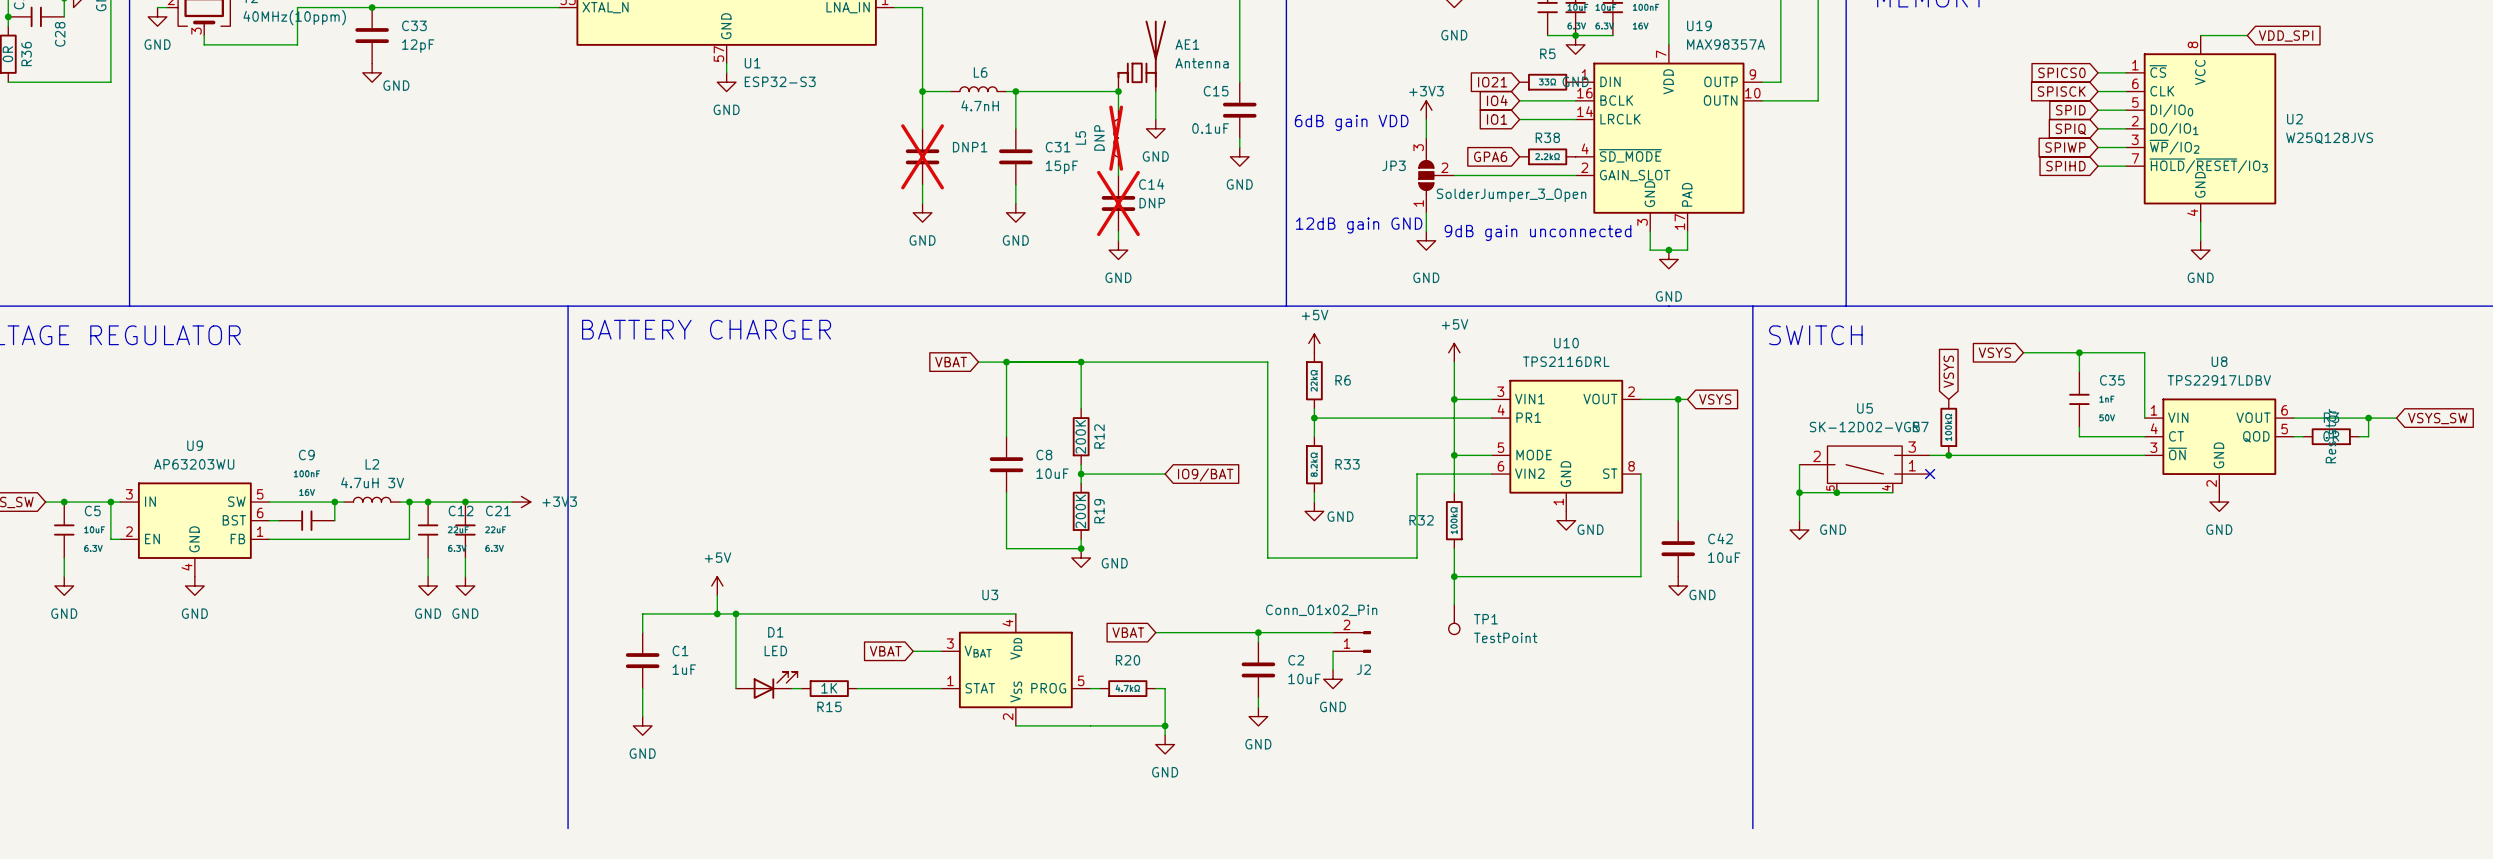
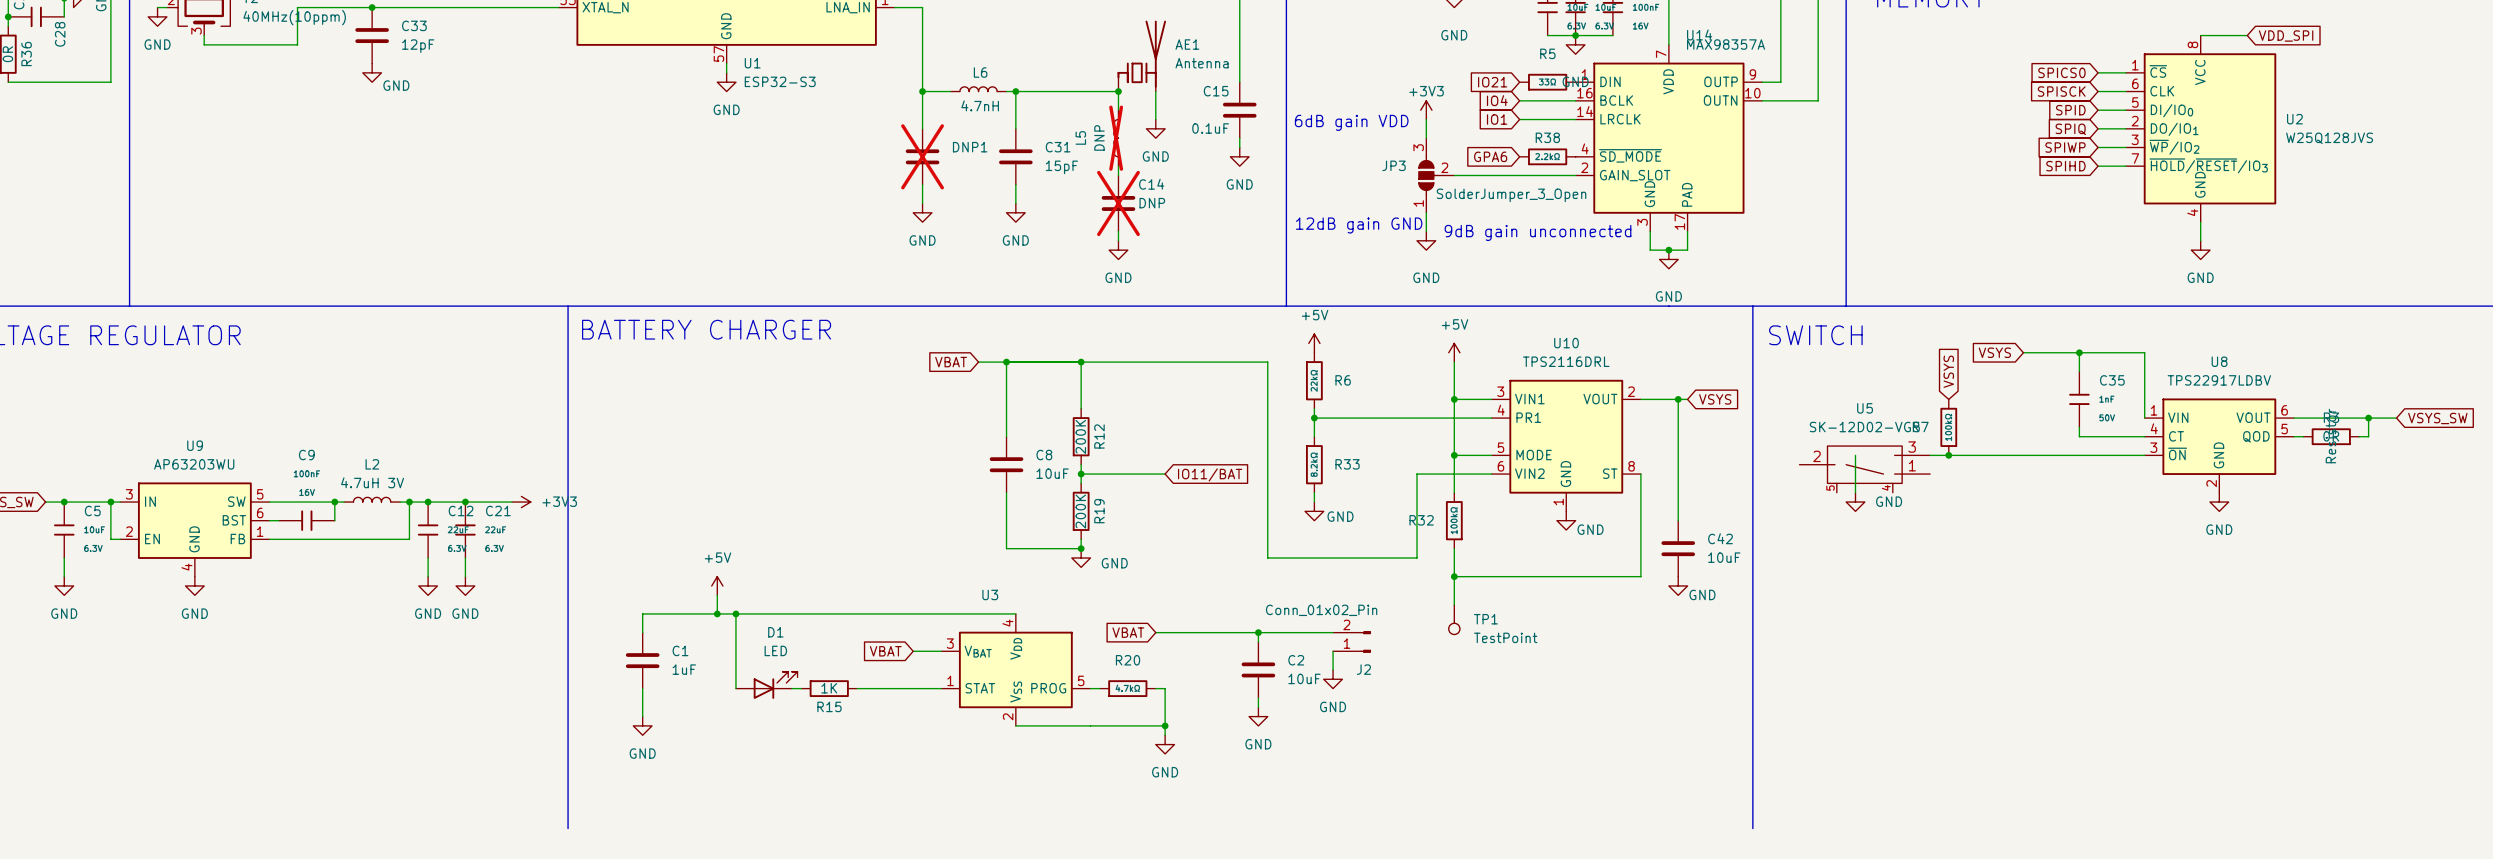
U19 name: U19 (1699, 25) -> U14 (1699, 34)
wire: none -> (1855, 455) (1855, 492)
wire: (1799, 464) (1799, 520) -> none
global label: IO9/BAT (1205, 474) -> IO11/BAT (1210, 474)
no-connect mark: (1930, 474) -> none
wire: (1799, 492) (1892, 492) -> none
junction: (1799, 492) -> none
junction: (1836, 492) -> none
power symbol position: GND (1799, 530) -> GND (1855, 502)

